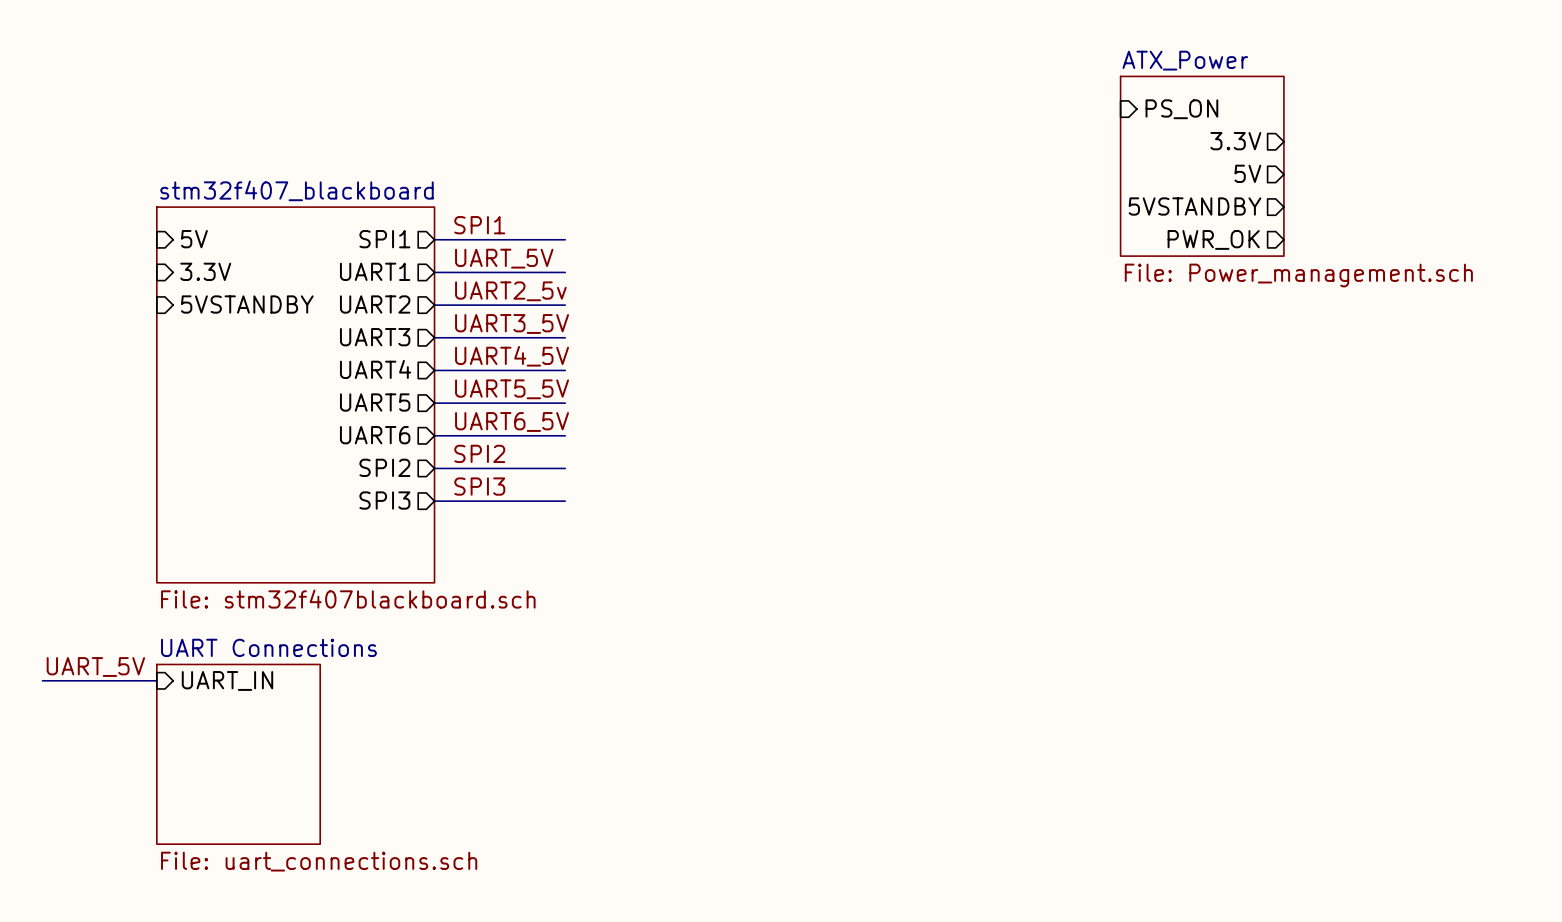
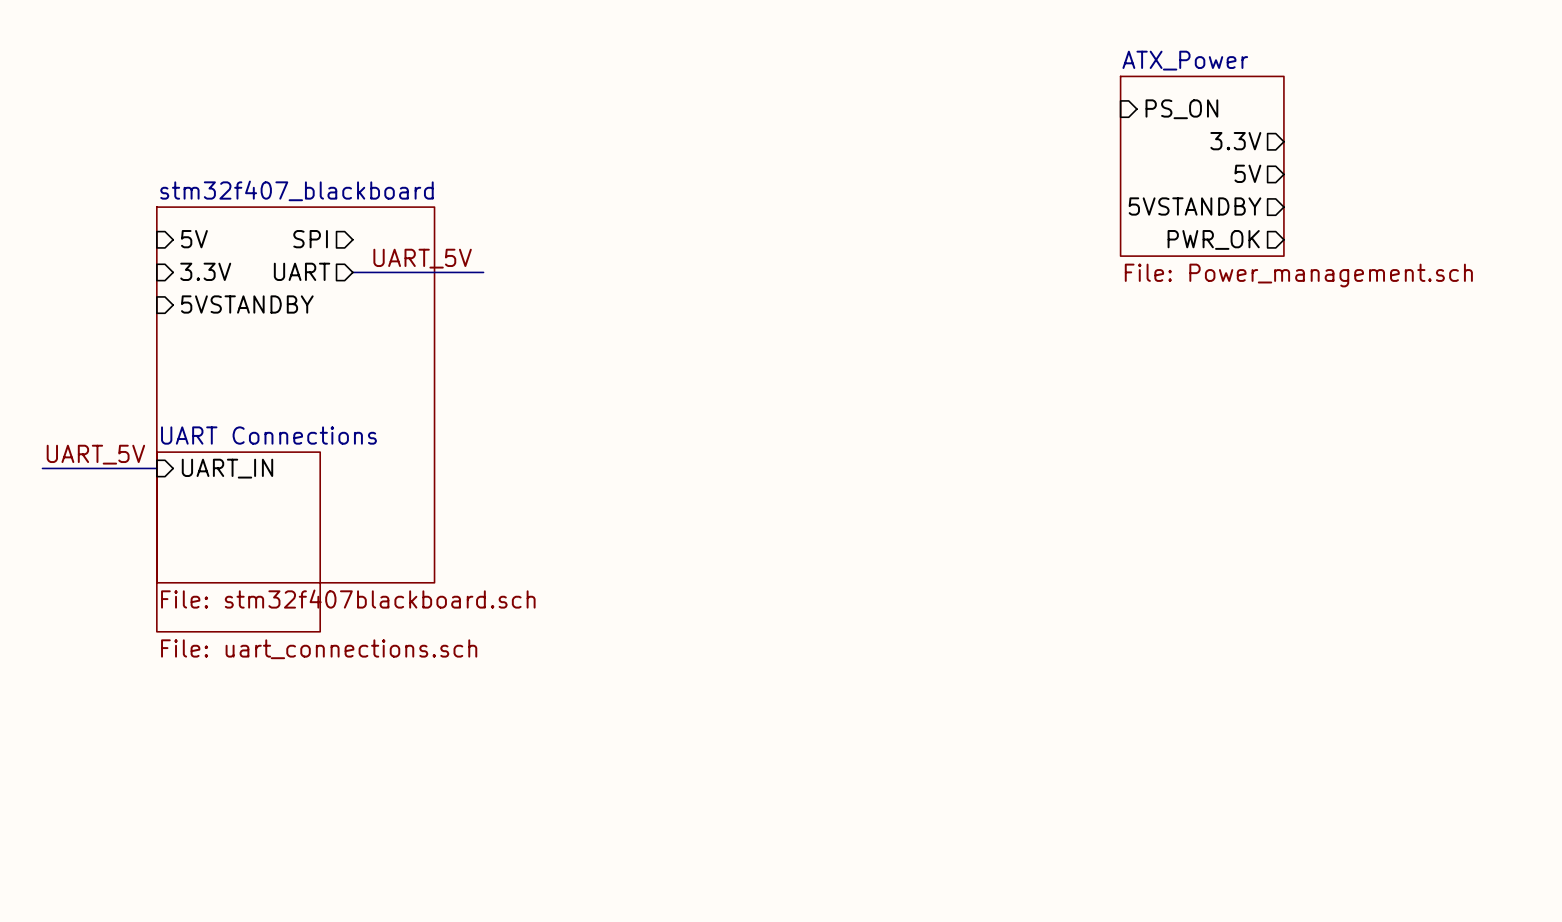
label: SPI1 (479, 225) -> none
sheet pin: none -> SPI (310, 239)
sheet pin: SPI1 (384, 239) -> none
bus: (434, 239) (565, 239) -> none
label position: UART_5V (504, 258) -> UART_5V (422, 258)
sheet pin: none -> UART (302, 271)
sheet pin: UART1 (375, 271) -> none
bus: (483, 272) (565, 272) -> (352, 272) (434, 272)
label: UART2_5v (510, 291) -> none
sheet pin: UART2 (375, 304) -> none
bus: (434, 305) (565, 305) -> none
label: UART3_5V (512, 323) -> none
sheet pin: UART3 (375, 337) -> none
bus: (434, 337) (565, 337) -> none
label: UART4_5V (512, 356) -> none
sheet pin: UART4 (375, 369) -> none
bus: (434, 370) (565, 370) -> none
label: UART5_5V (512, 389) -> none
sheet pin: UART5 (375, 402) -> none
bus: (434, 403) (565, 403) -> none
label: UART6_5V (512, 421) -> none
sheet pin: UART6 (375, 435) -> none
bus: (434, 435) (565, 435) -> none
label: SPI2 (479, 453) -> none
sheet pin: SPI2 (384, 467) -> none
bus: (434, 468) (565, 468) -> none
label: SPI3 (479, 486) -> none
sheet pin: SPI3 (384, 500) -> none
bus: (434, 501) (565, 501) -> none
label position: UART_5V (95, 667) -> UART_5V (95, 454)
bus: (42, 680) (156, 680) -> (42, 468) (156, 468)
sheet pin position: UART_IN (227, 680) -> UART_IN (227, 468)
sheet UART Connections position: (238, 754) -> (238, 541)

